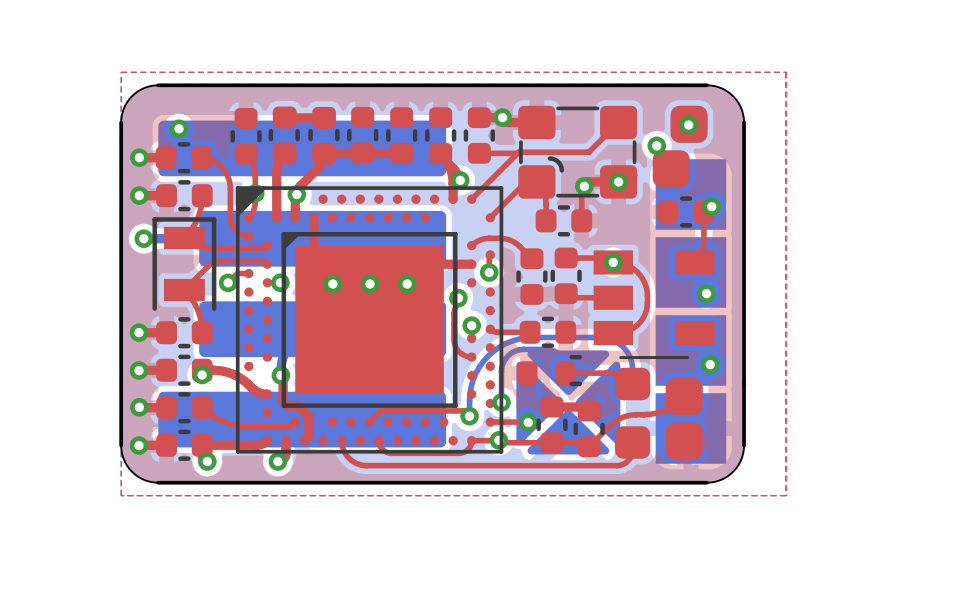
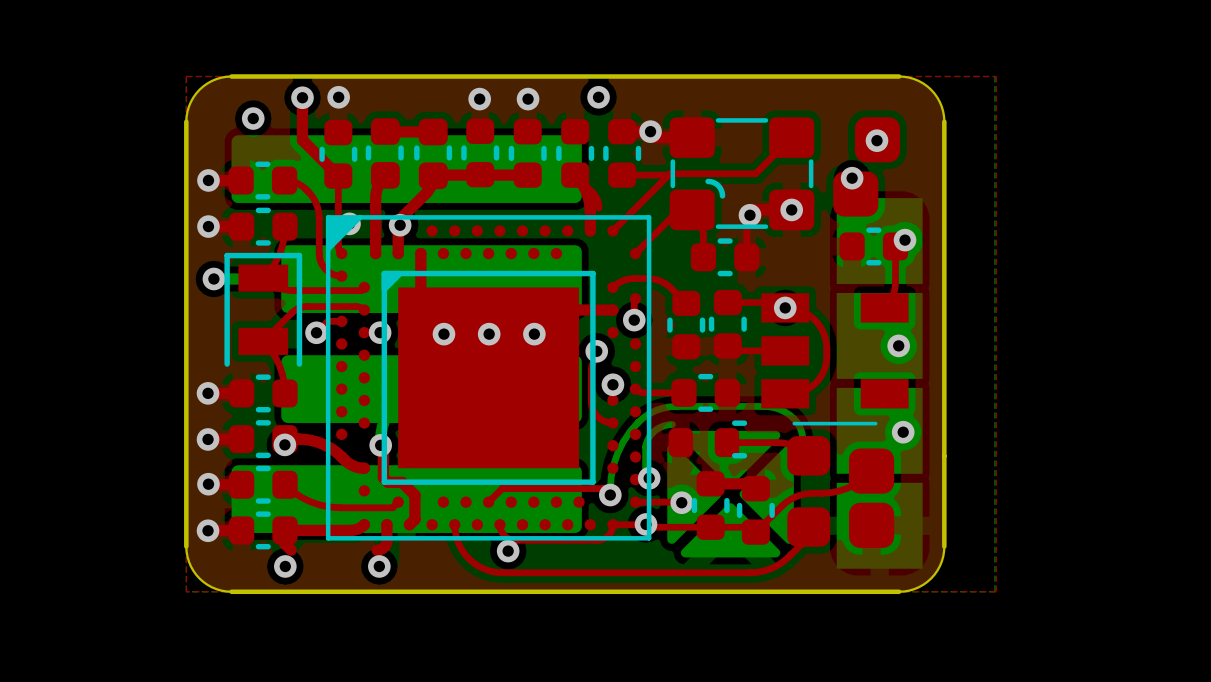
via: none -> (302, 97)
via: none -> (338, 97)
via: none -> (598, 97)
via: none -> (479, 99)
via: none -> (528, 99)
board edge: (121, 122) (123, 110) (132, 96) (142, 88) (158, 85) (711, 85) (723, 88) (733, 96) (740, 106) (744, 122) -> (186, 137) (187, 111) (196, 93) (211, 80) (231, 76) (904, 76) (923, 83) (937, 97) (943, 111) (944, 137)
via position: (179, 128) -> (253, 118)
via position: (656, 145) -> (852, 178)
top track: (246, 154) (252, 164) (255, 176) (255, 205) (248, 217) -> (302, 97) (302, 140) (338, 176) (338, 245) (341, 253)
via: (460, 180) -> none
part position: (621, 311) -> (794, 383)
bottom track: (568, 372) (565, 361) (553, 351) (544, 349) (515, 351) (506, 358) (502, 365) (501, 402) -> (672, 424) (657, 429) (647, 441) (645, 474) (649, 478)
bottom track: (598, 402) (607, 401) (617, 397) (629, 383) (632, 366) (629, 355) (623, 346) (614, 340) (603, 337) (525, 337) (512, 341) (499, 347) (483, 361) (475, 373) (471, 386) (469, 412) -> (766, 494) (796, 464) (801, 452) (802, 440) (800, 428) (793, 418) (780, 409) (764, 406) (676, 406) (662, 408) (649, 413) (638, 422) (623, 442) (613, 465) (610, 489)
top track: (341, 440) (344, 451) (349, 458) (355, 463) (366, 465) (618, 465) (624, 463) (630, 457) (632, 442) -> (454, 524) (458, 543) (468, 558) (484, 569) (502, 572) (757, 572) (777, 565) (789, 556) (804, 540) (808, 527)
board edge: (121, 445) (123, 457) (132, 471) (142, 479) (158, 482) (711, 482) (723, 479) (735, 468) (741, 457) (744, 445) -> (186, 530) (187, 556) (196, 574) (211, 587) (231, 591) (904, 591) (923, 584) (937, 570) (943, 556) (944, 530)
via position: (207, 461) -> (285, 566)
via position: (277, 461) -> (379, 566)
via: none -> (508, 551)

